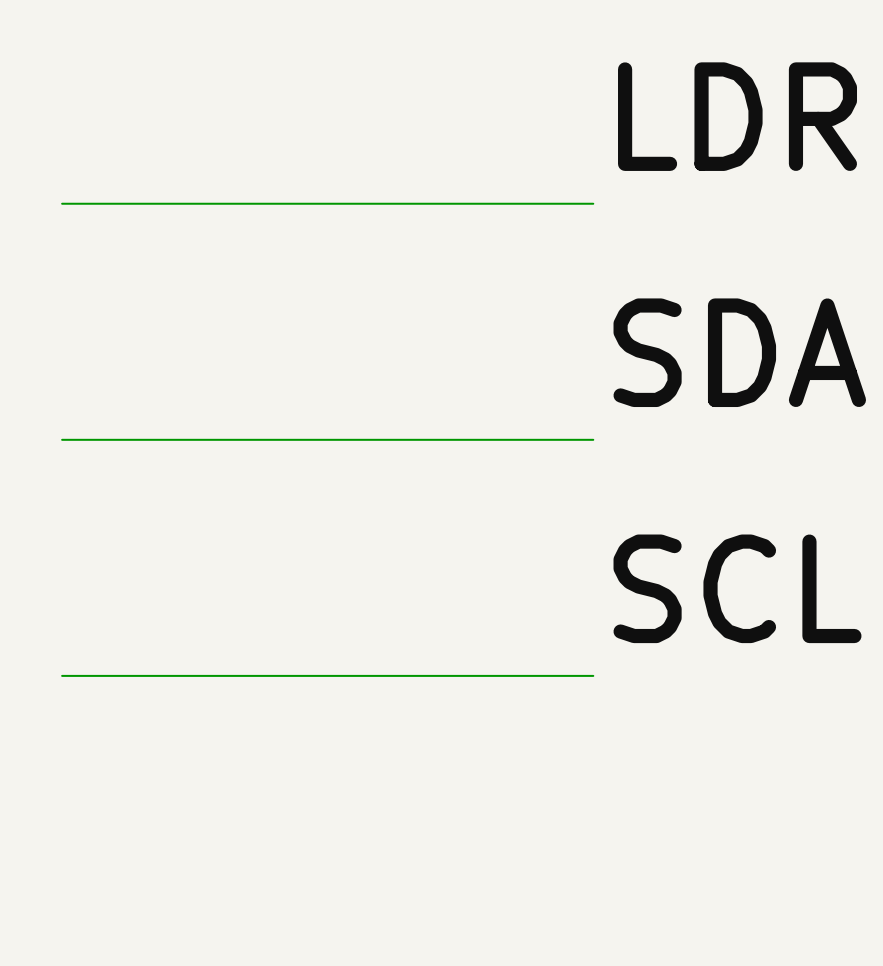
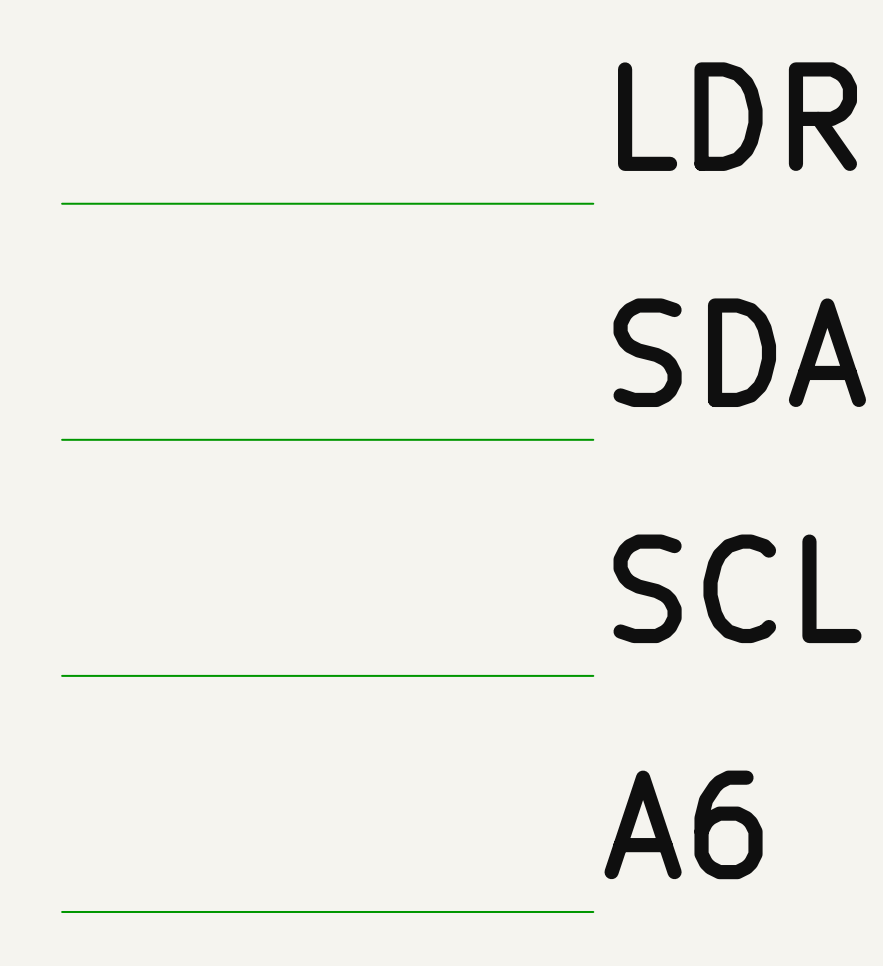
label: none -> A6 (683, 824)
wire: none -> (62, 911) (593, 911)

